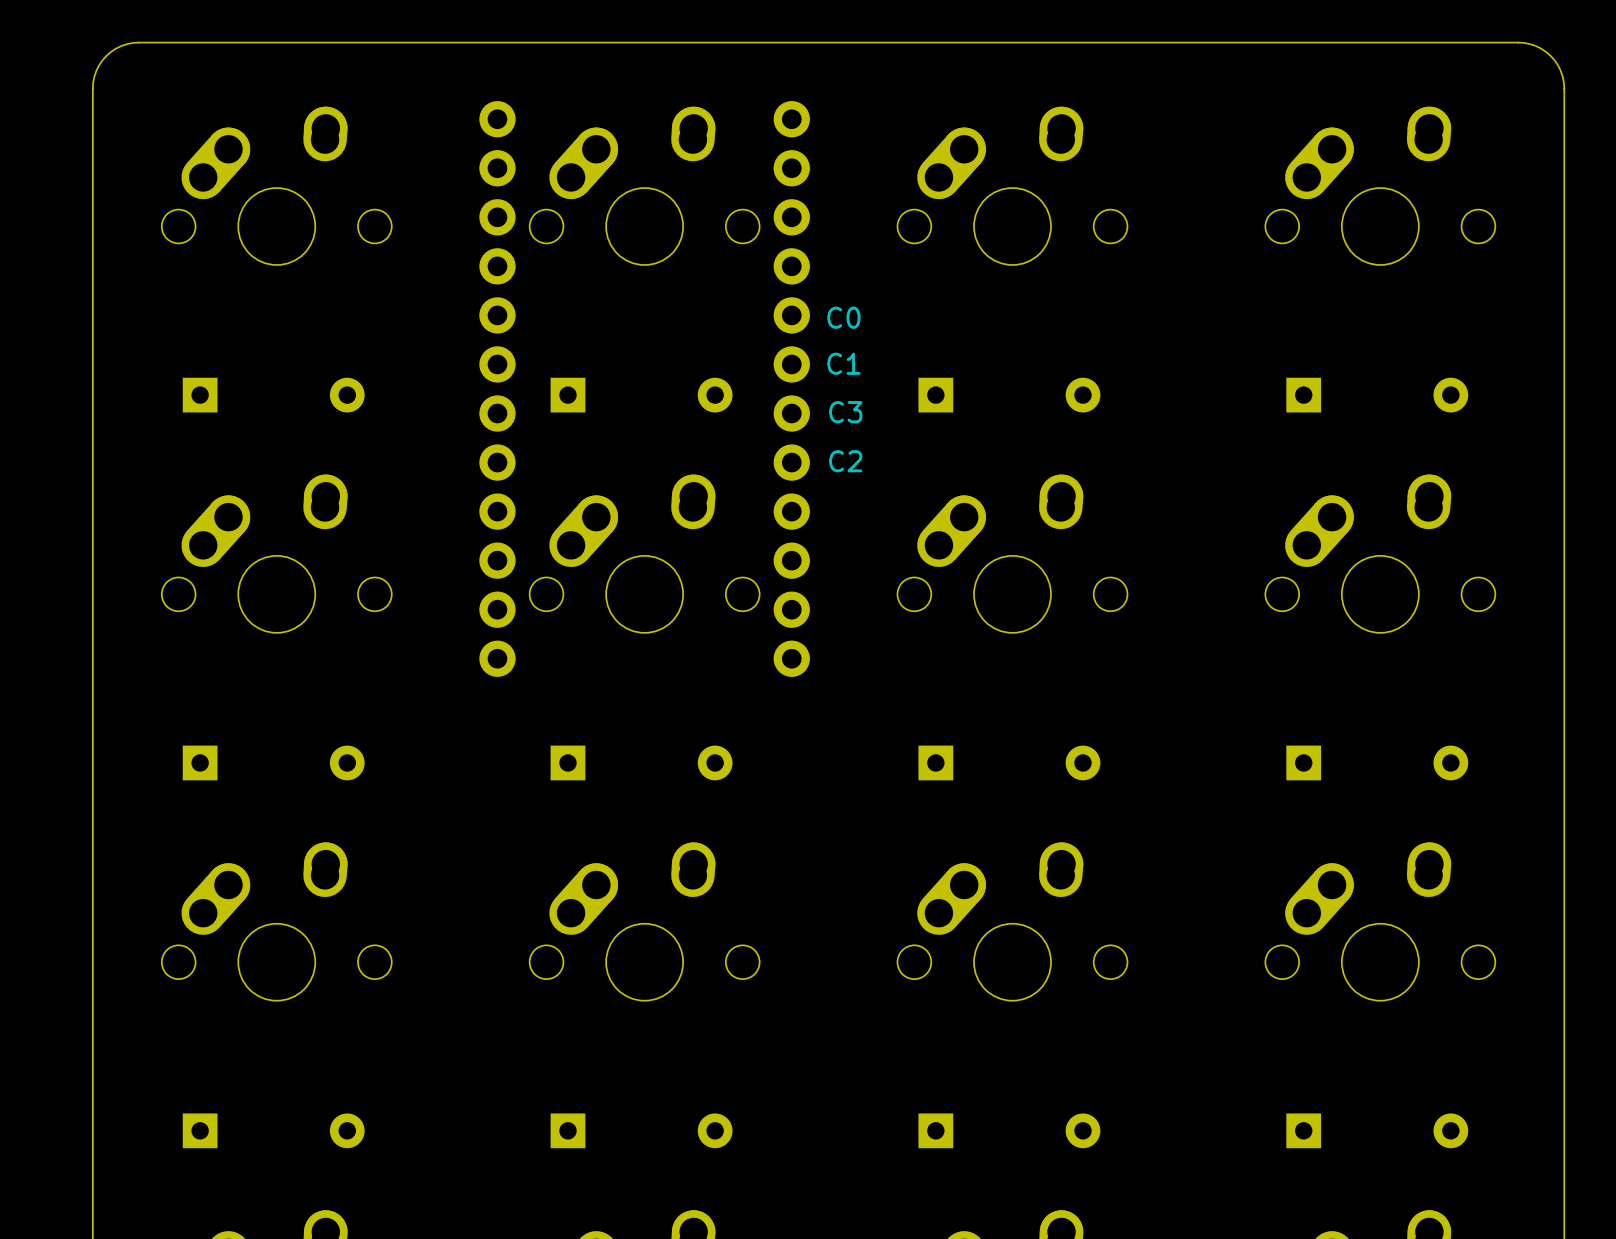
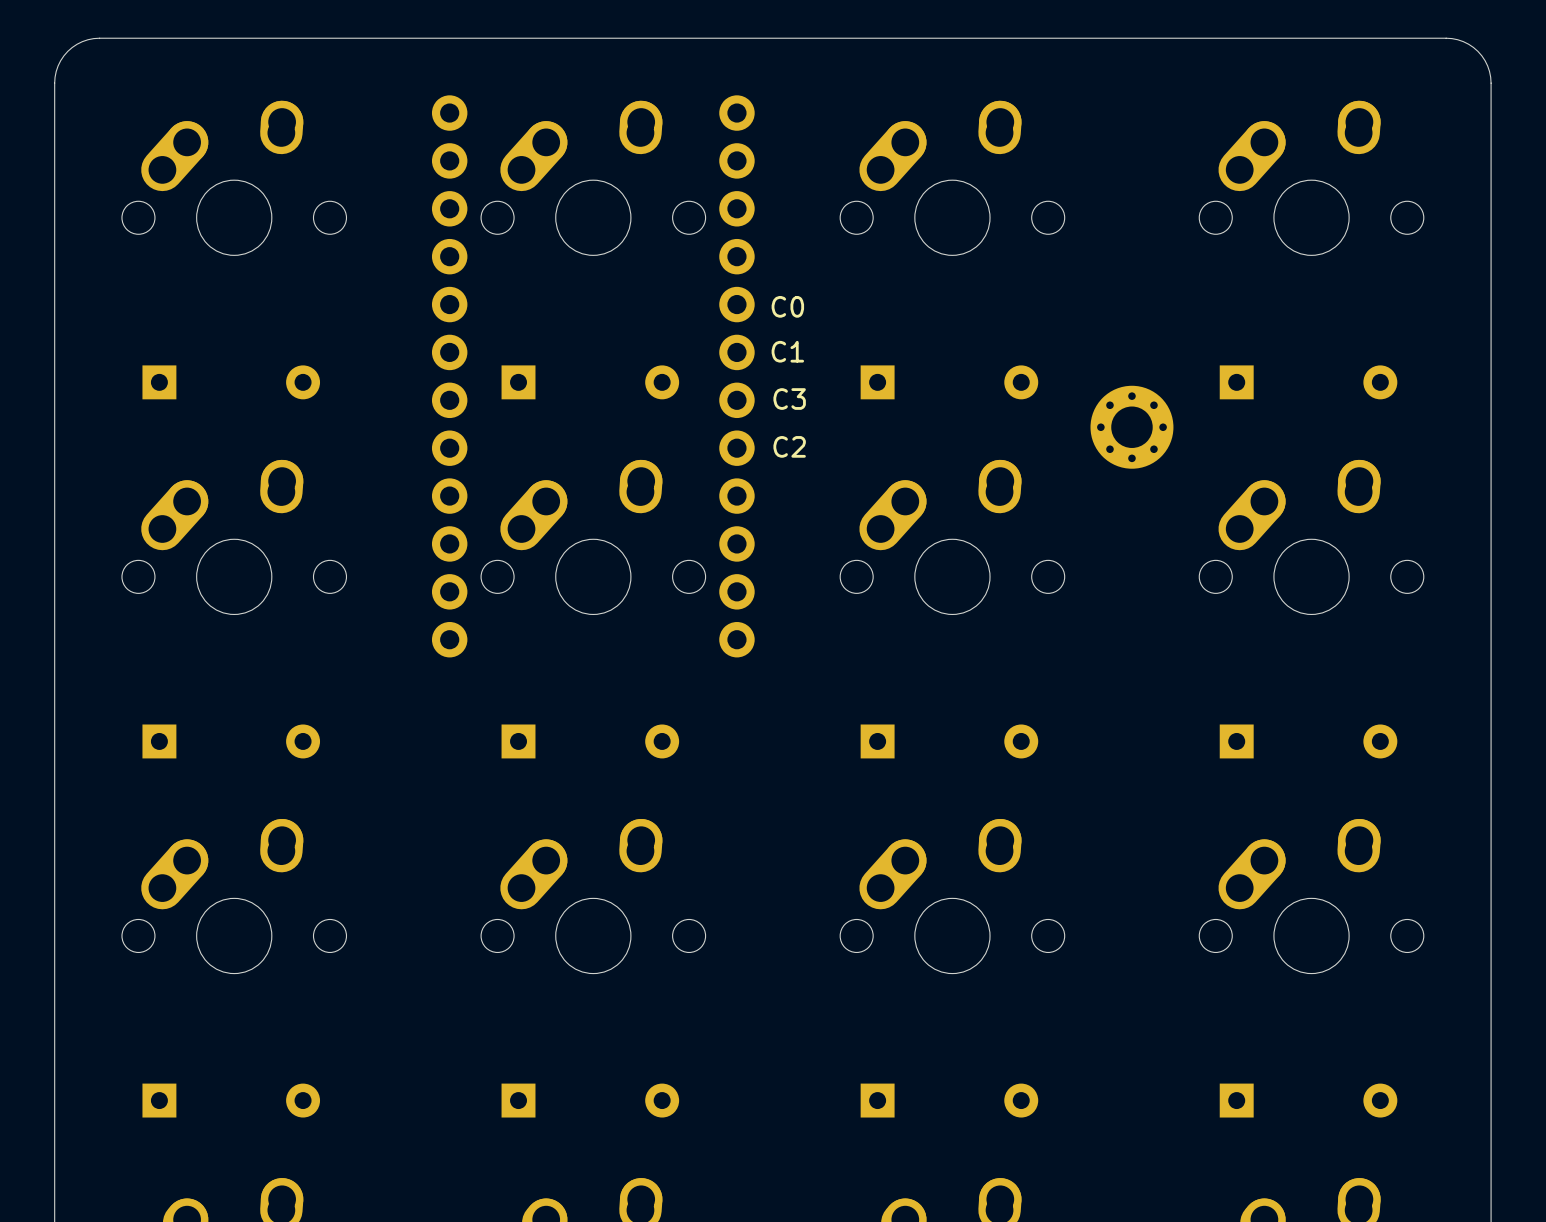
part: none -> (1131, 427)

